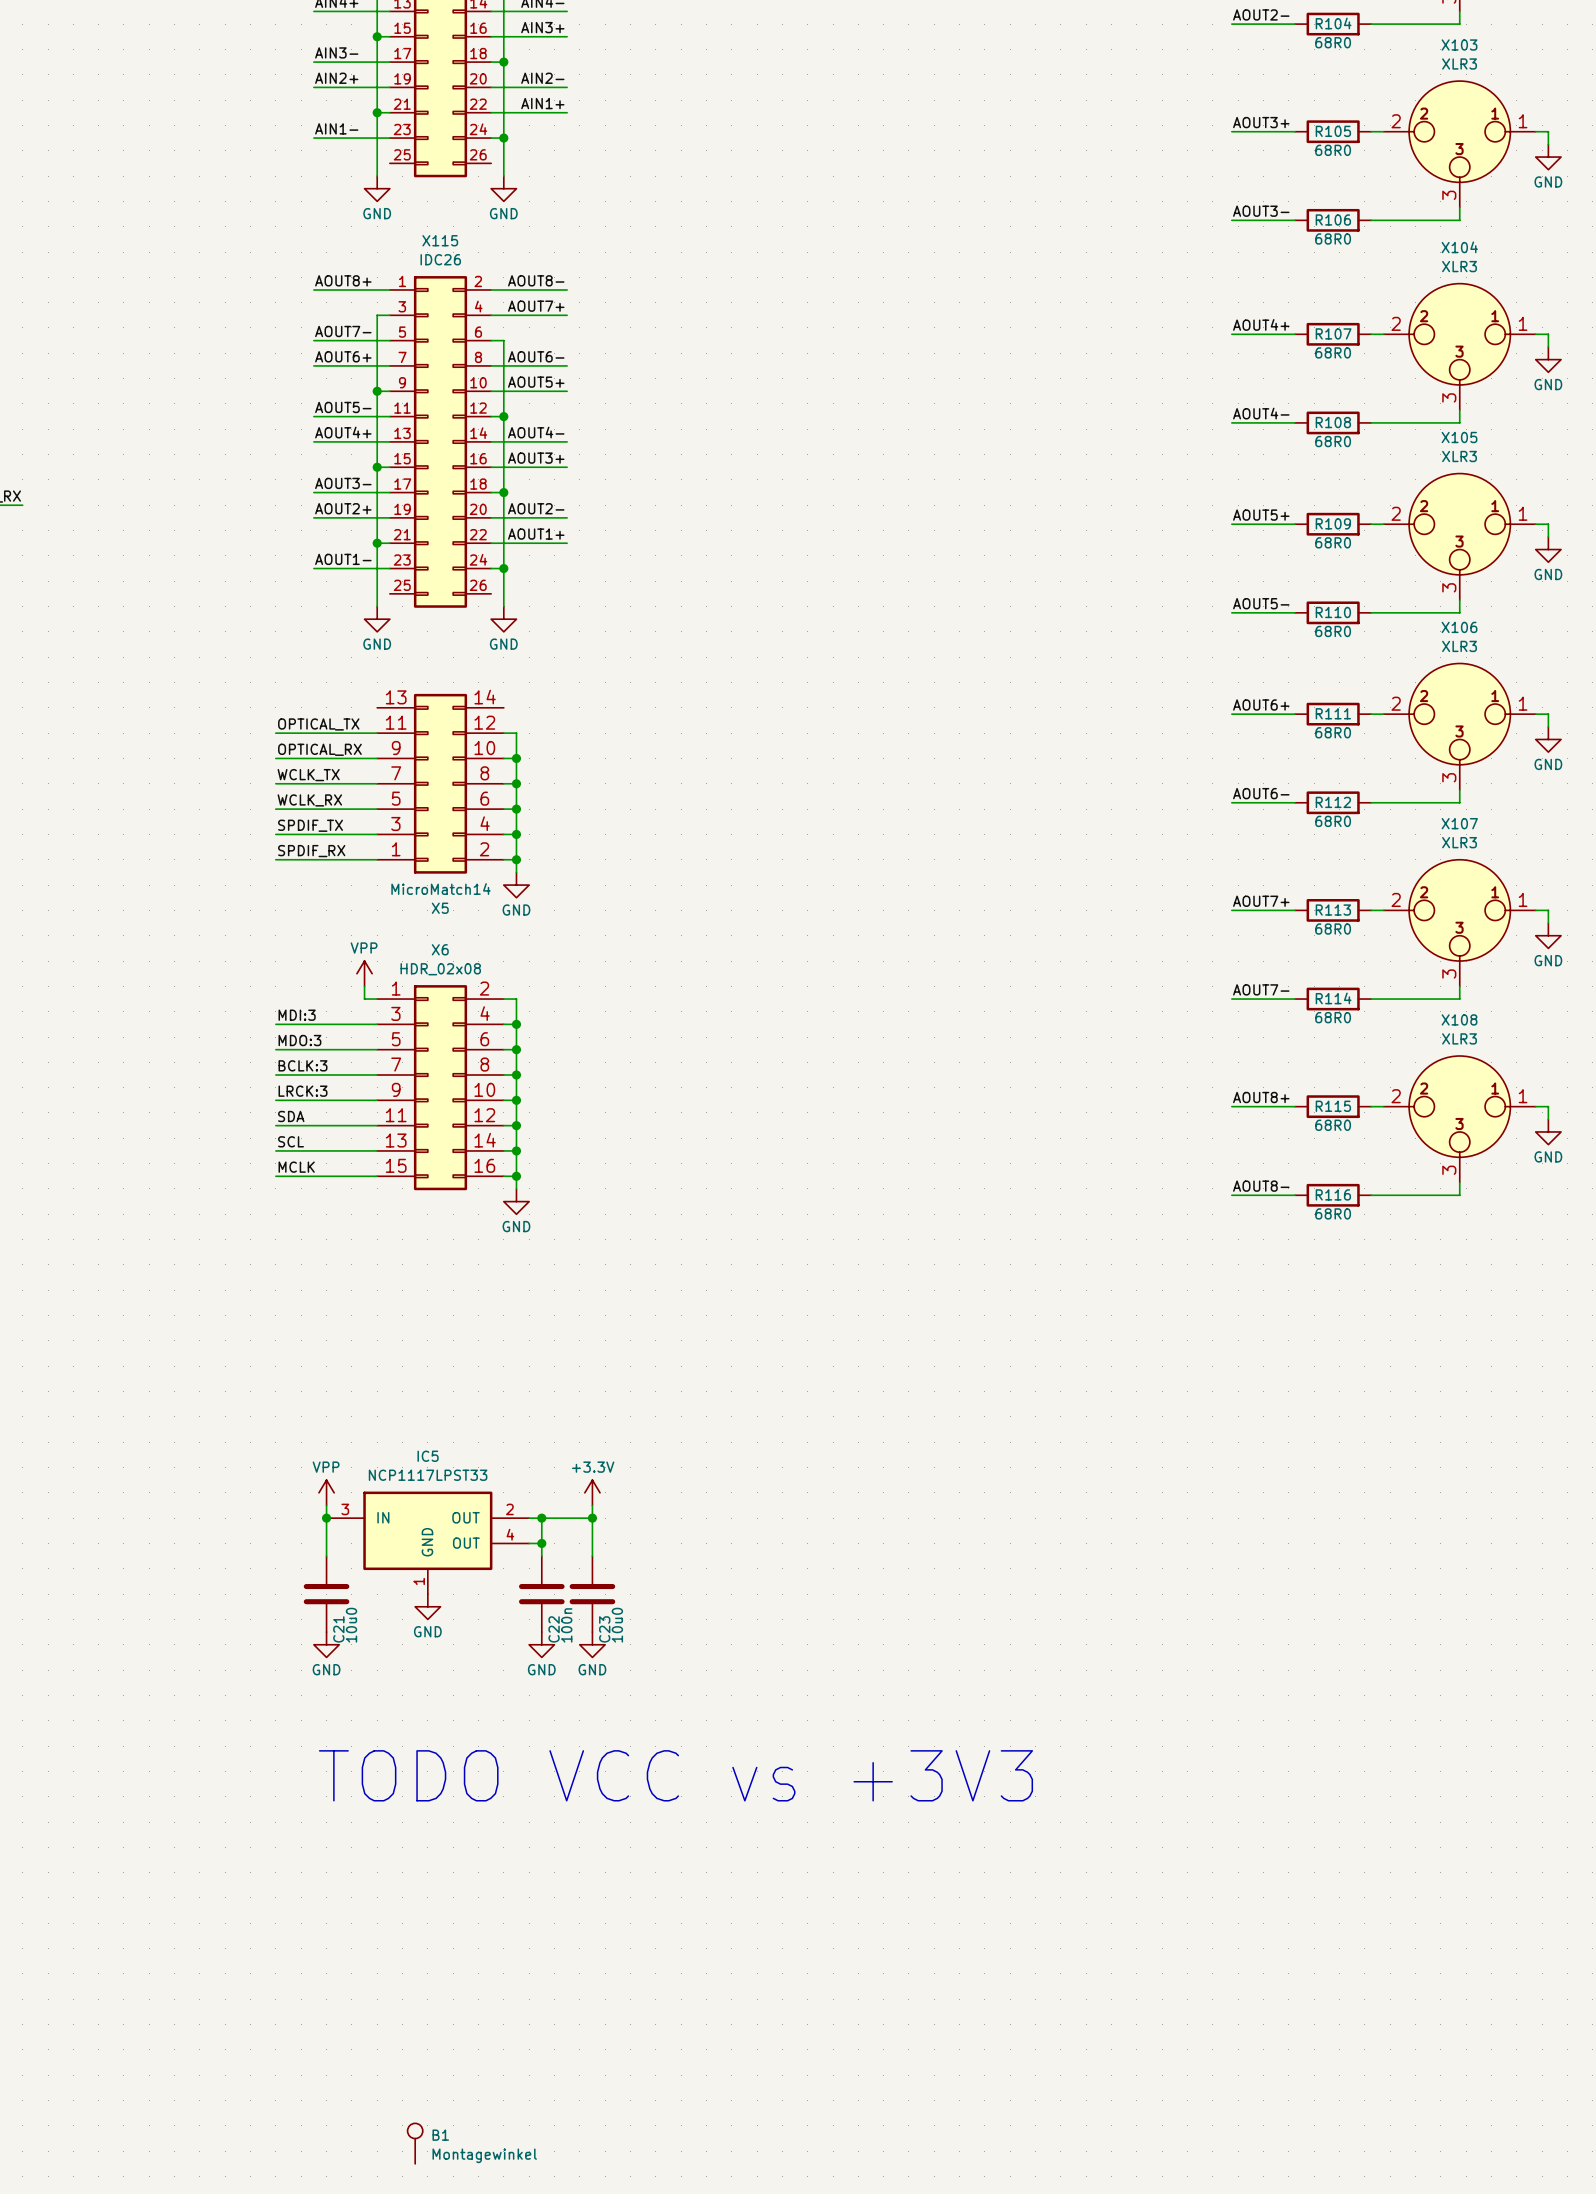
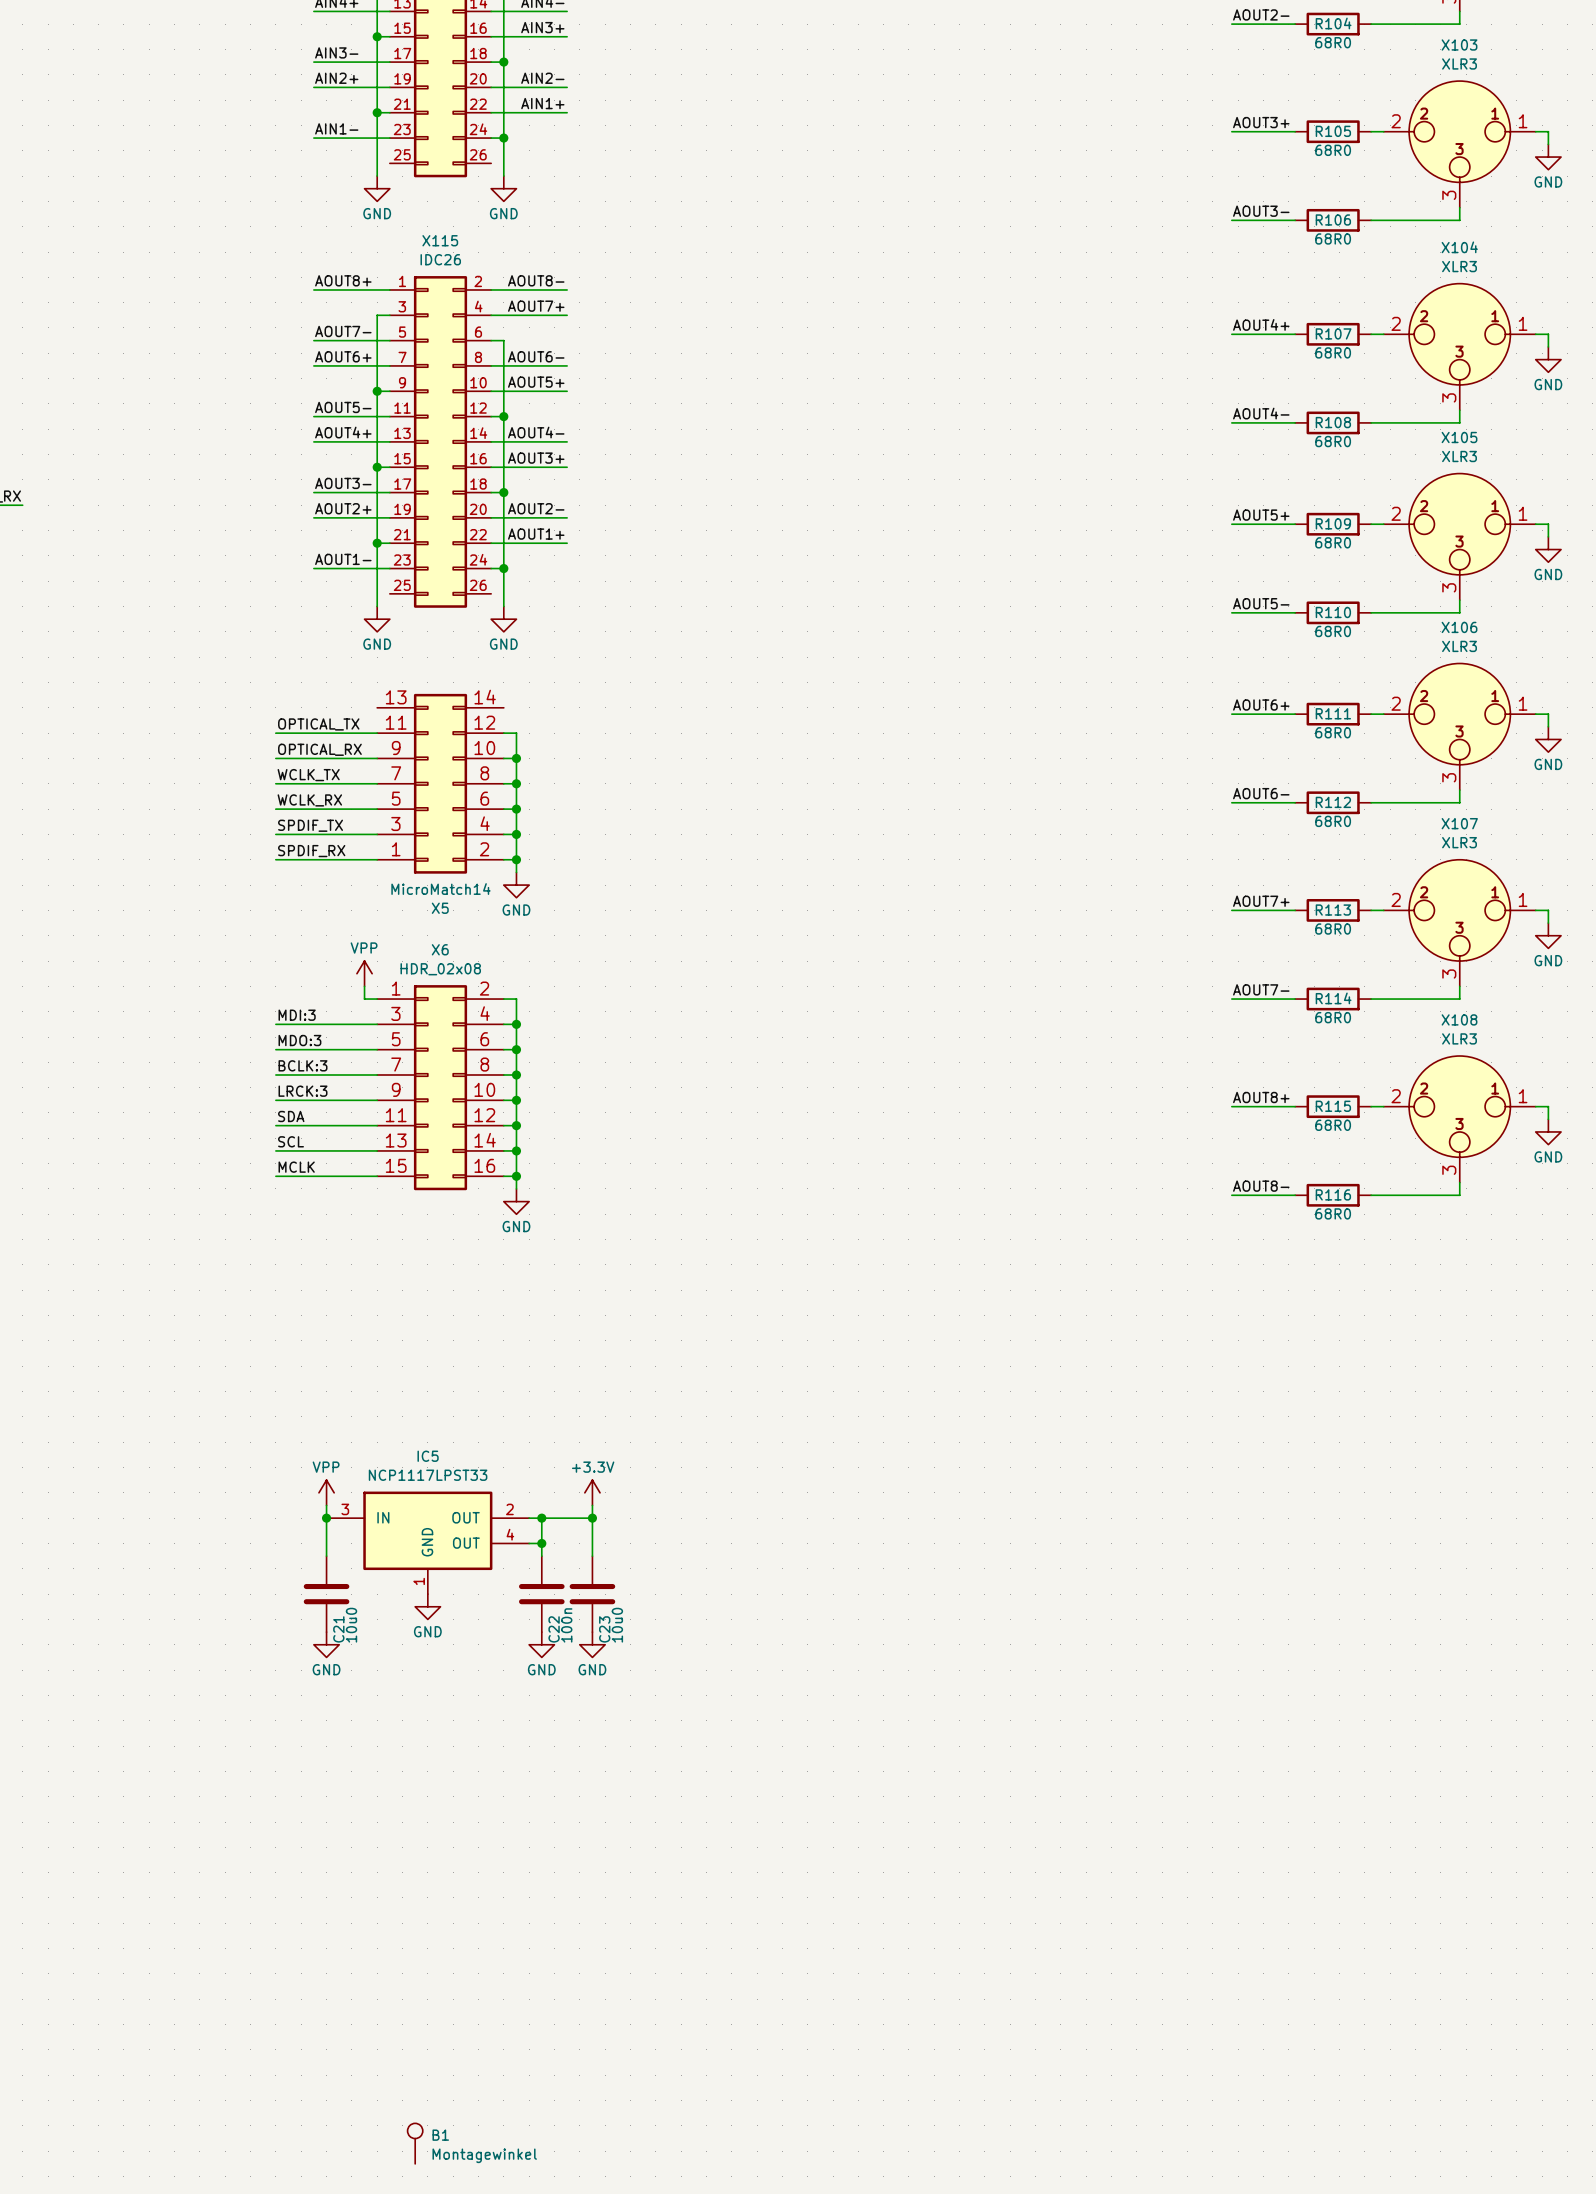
text: TODO VCC vs +3V3 (675, 1775) -> none

